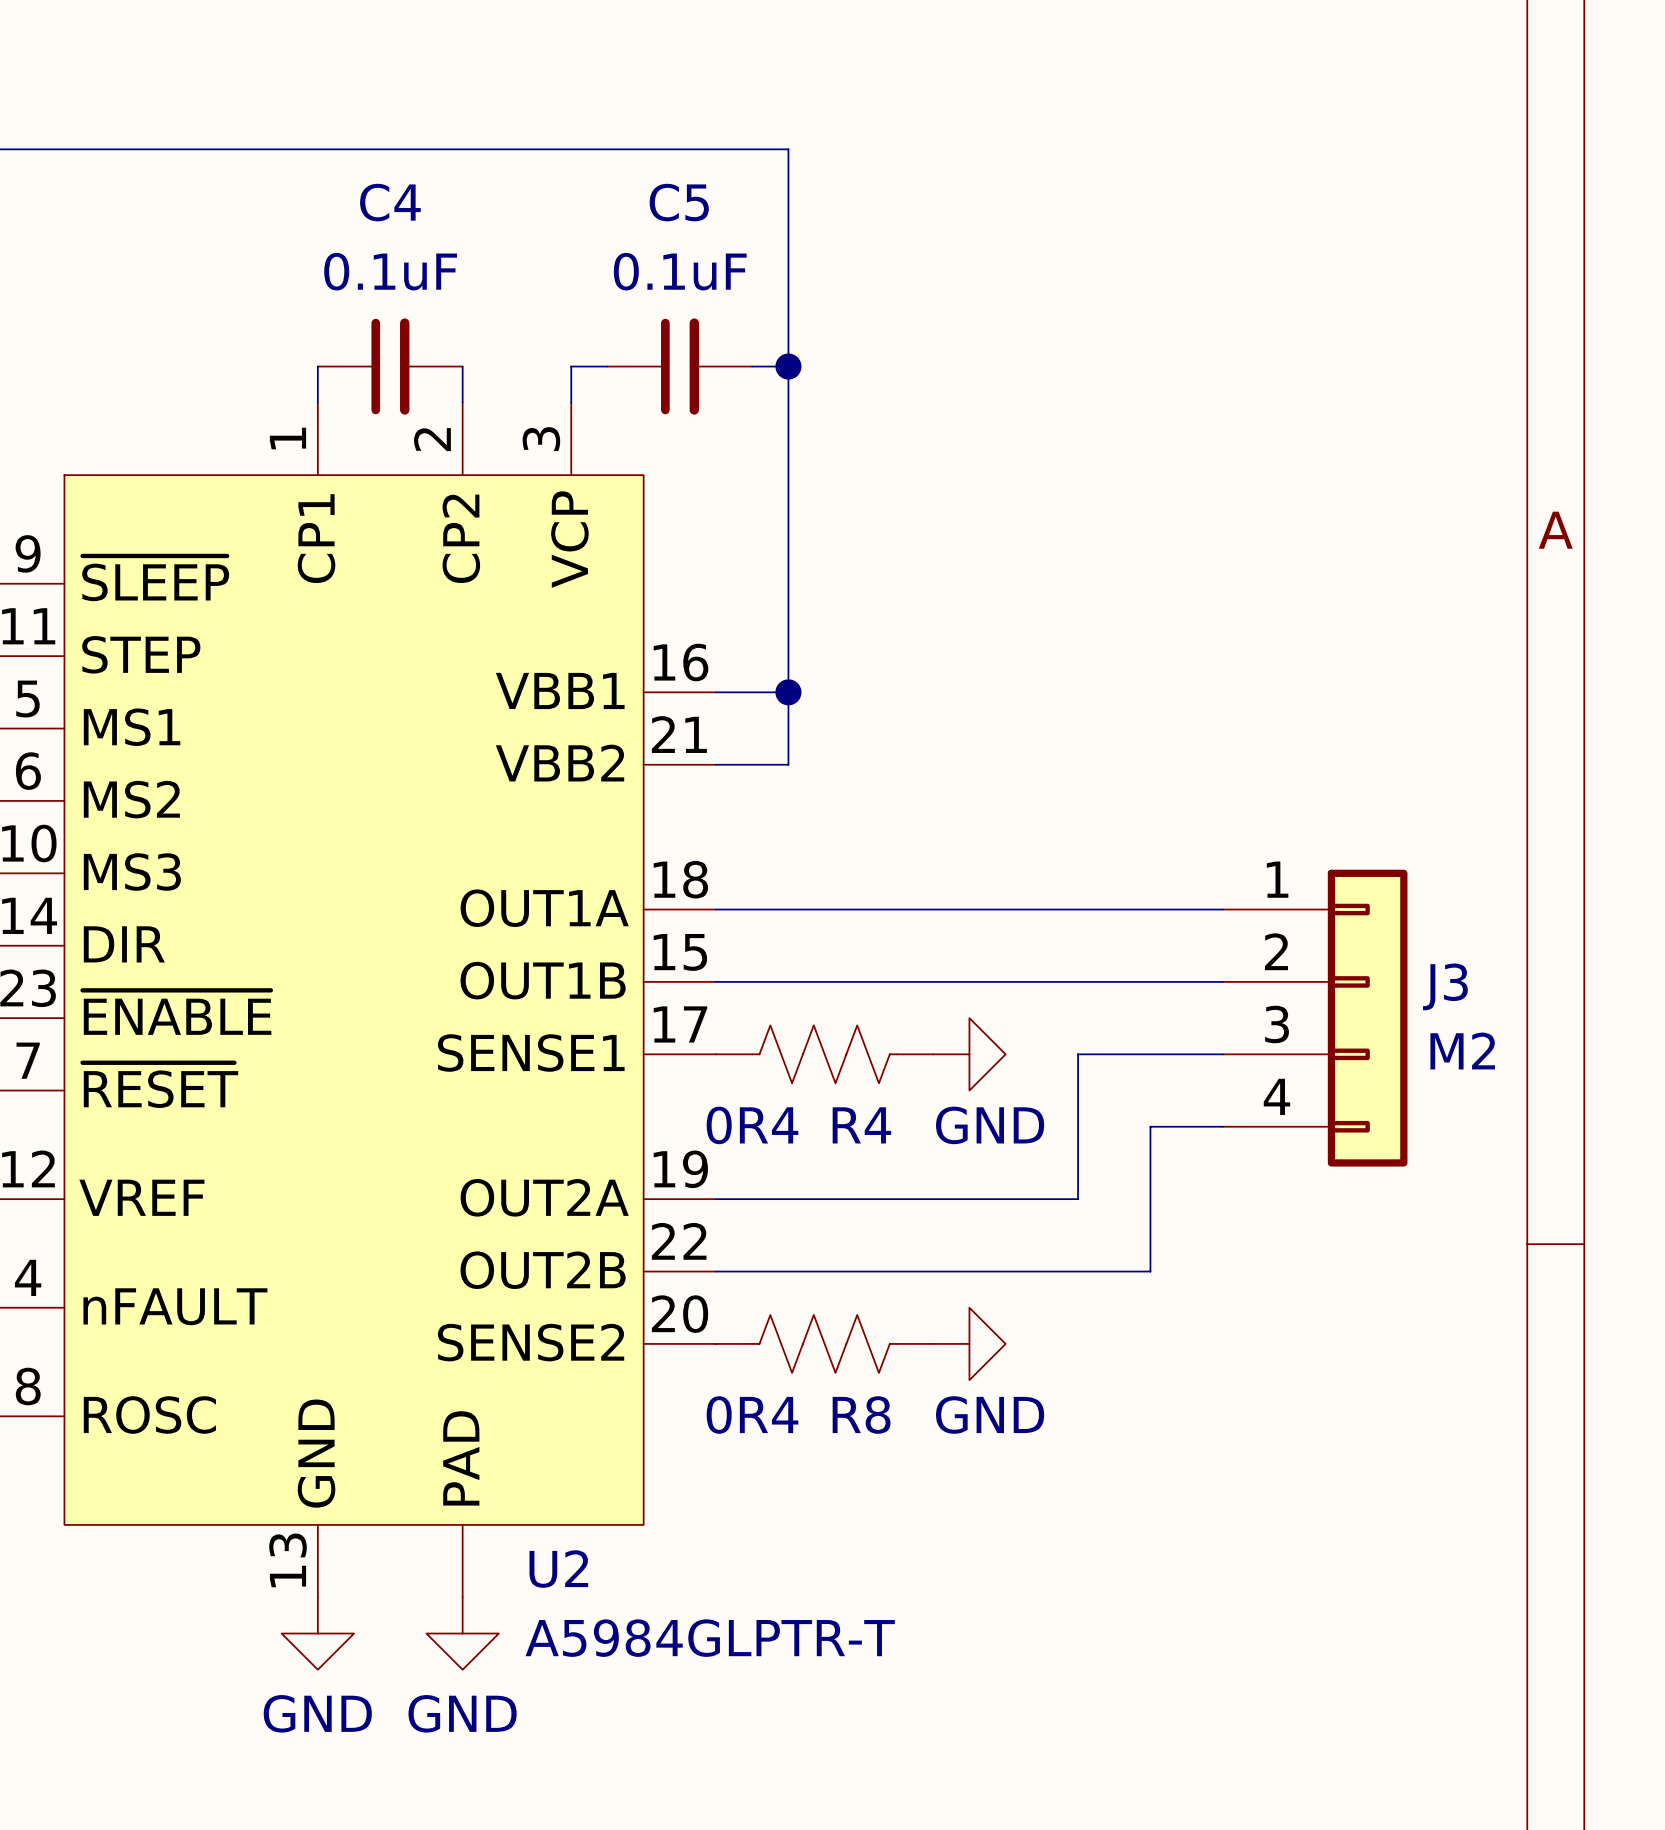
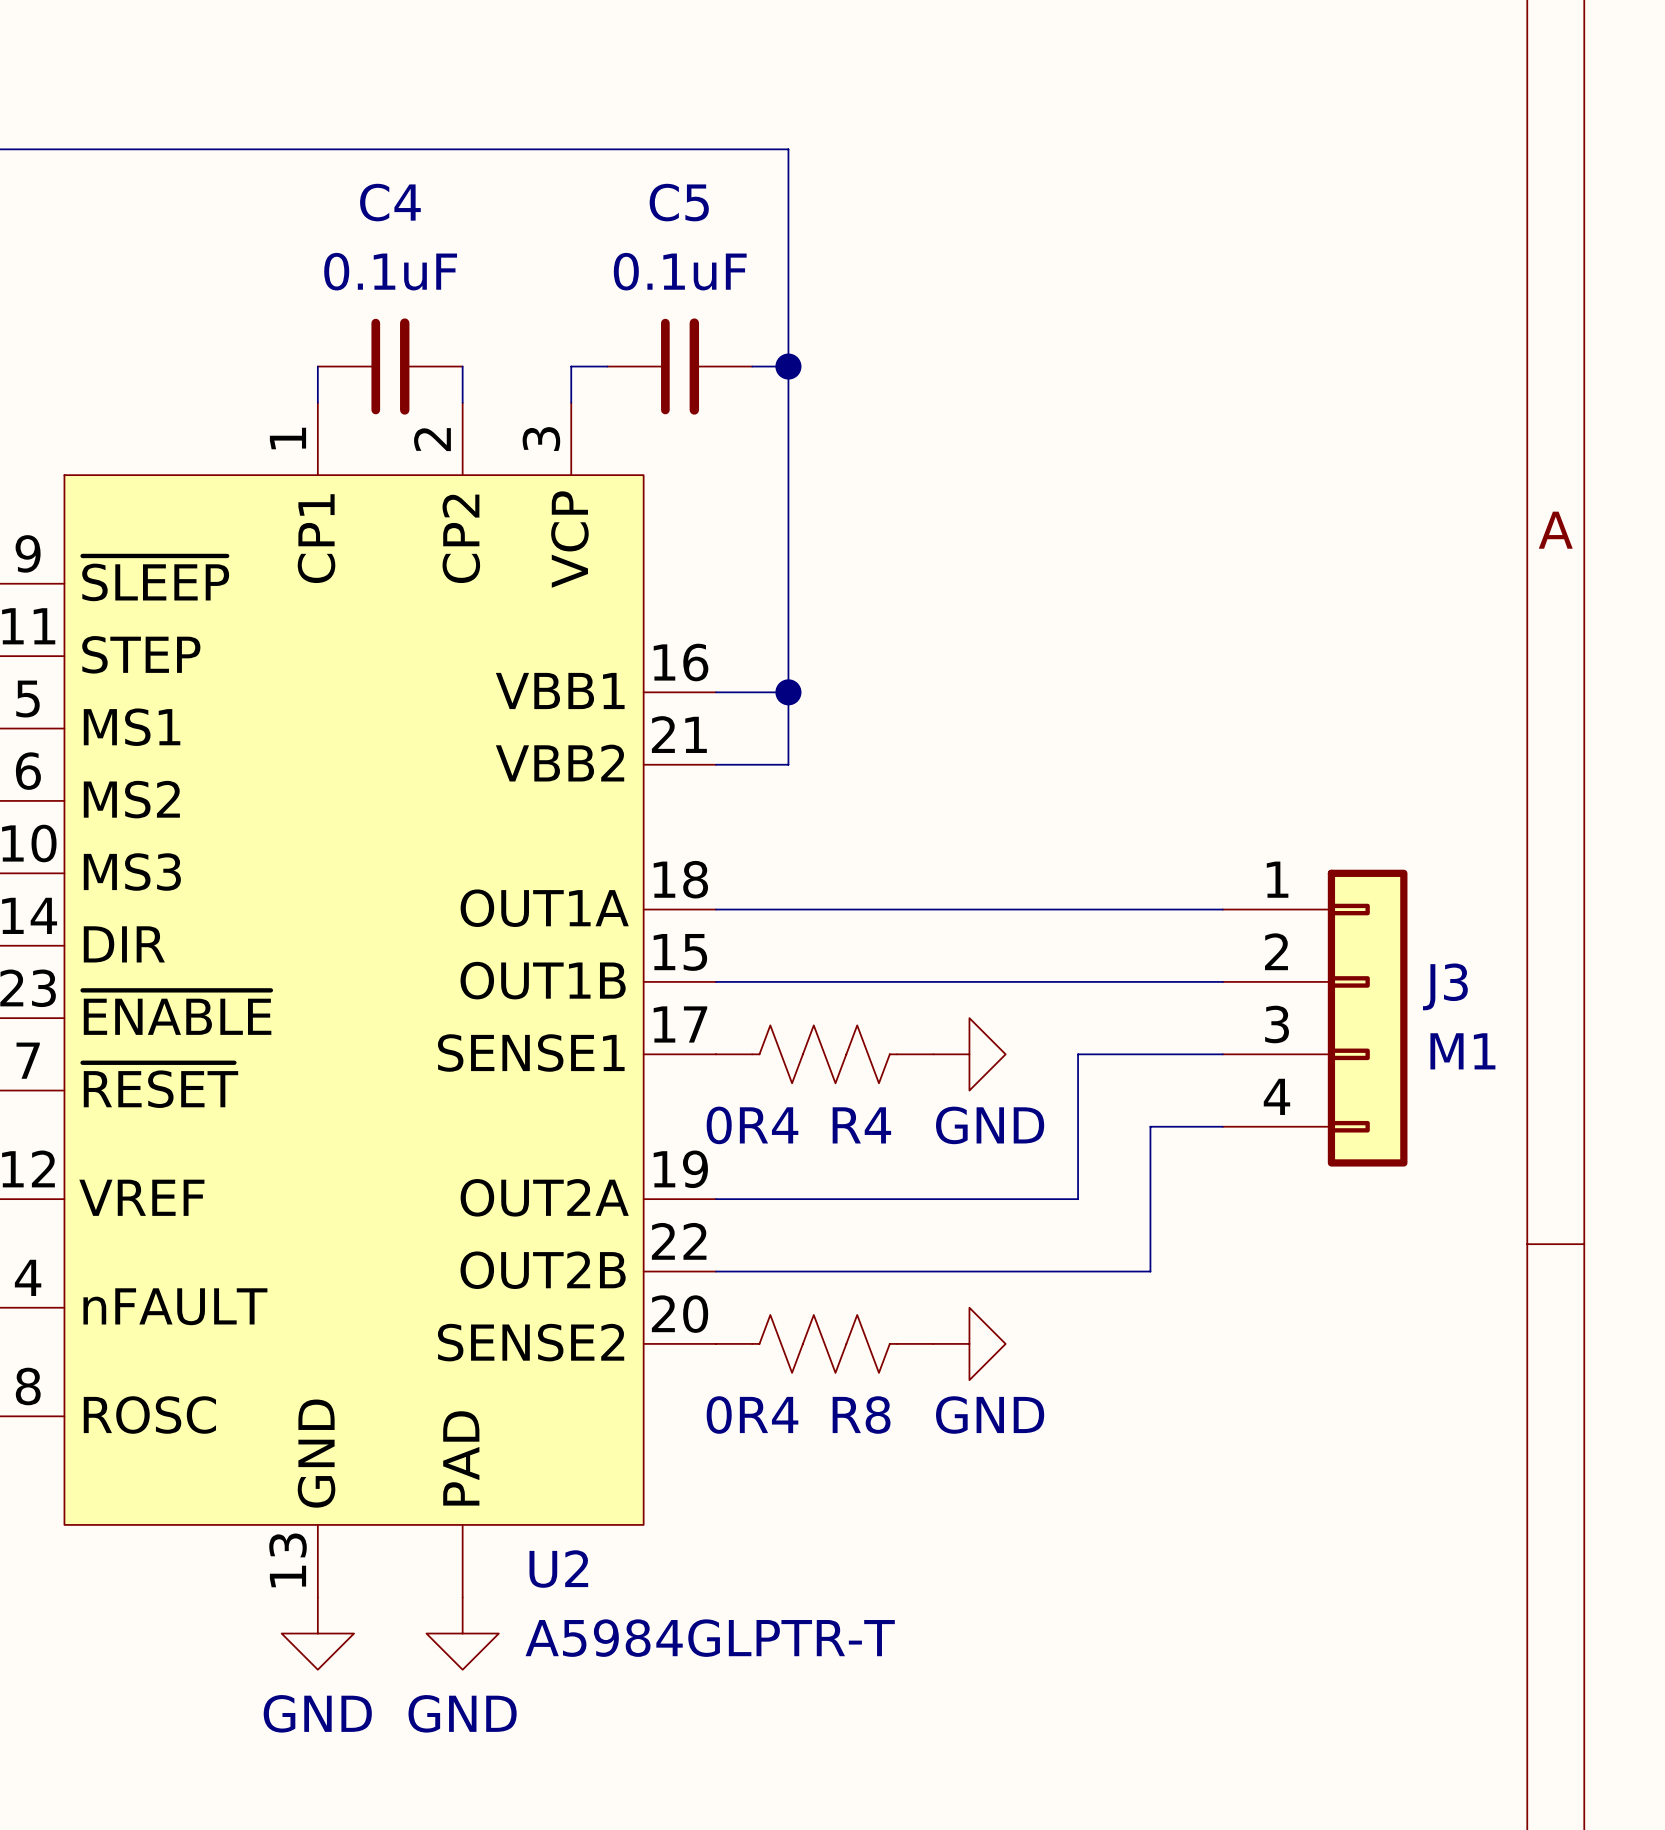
J3 value: M2 (1462, 1051) -> M1 (1462, 1051)

